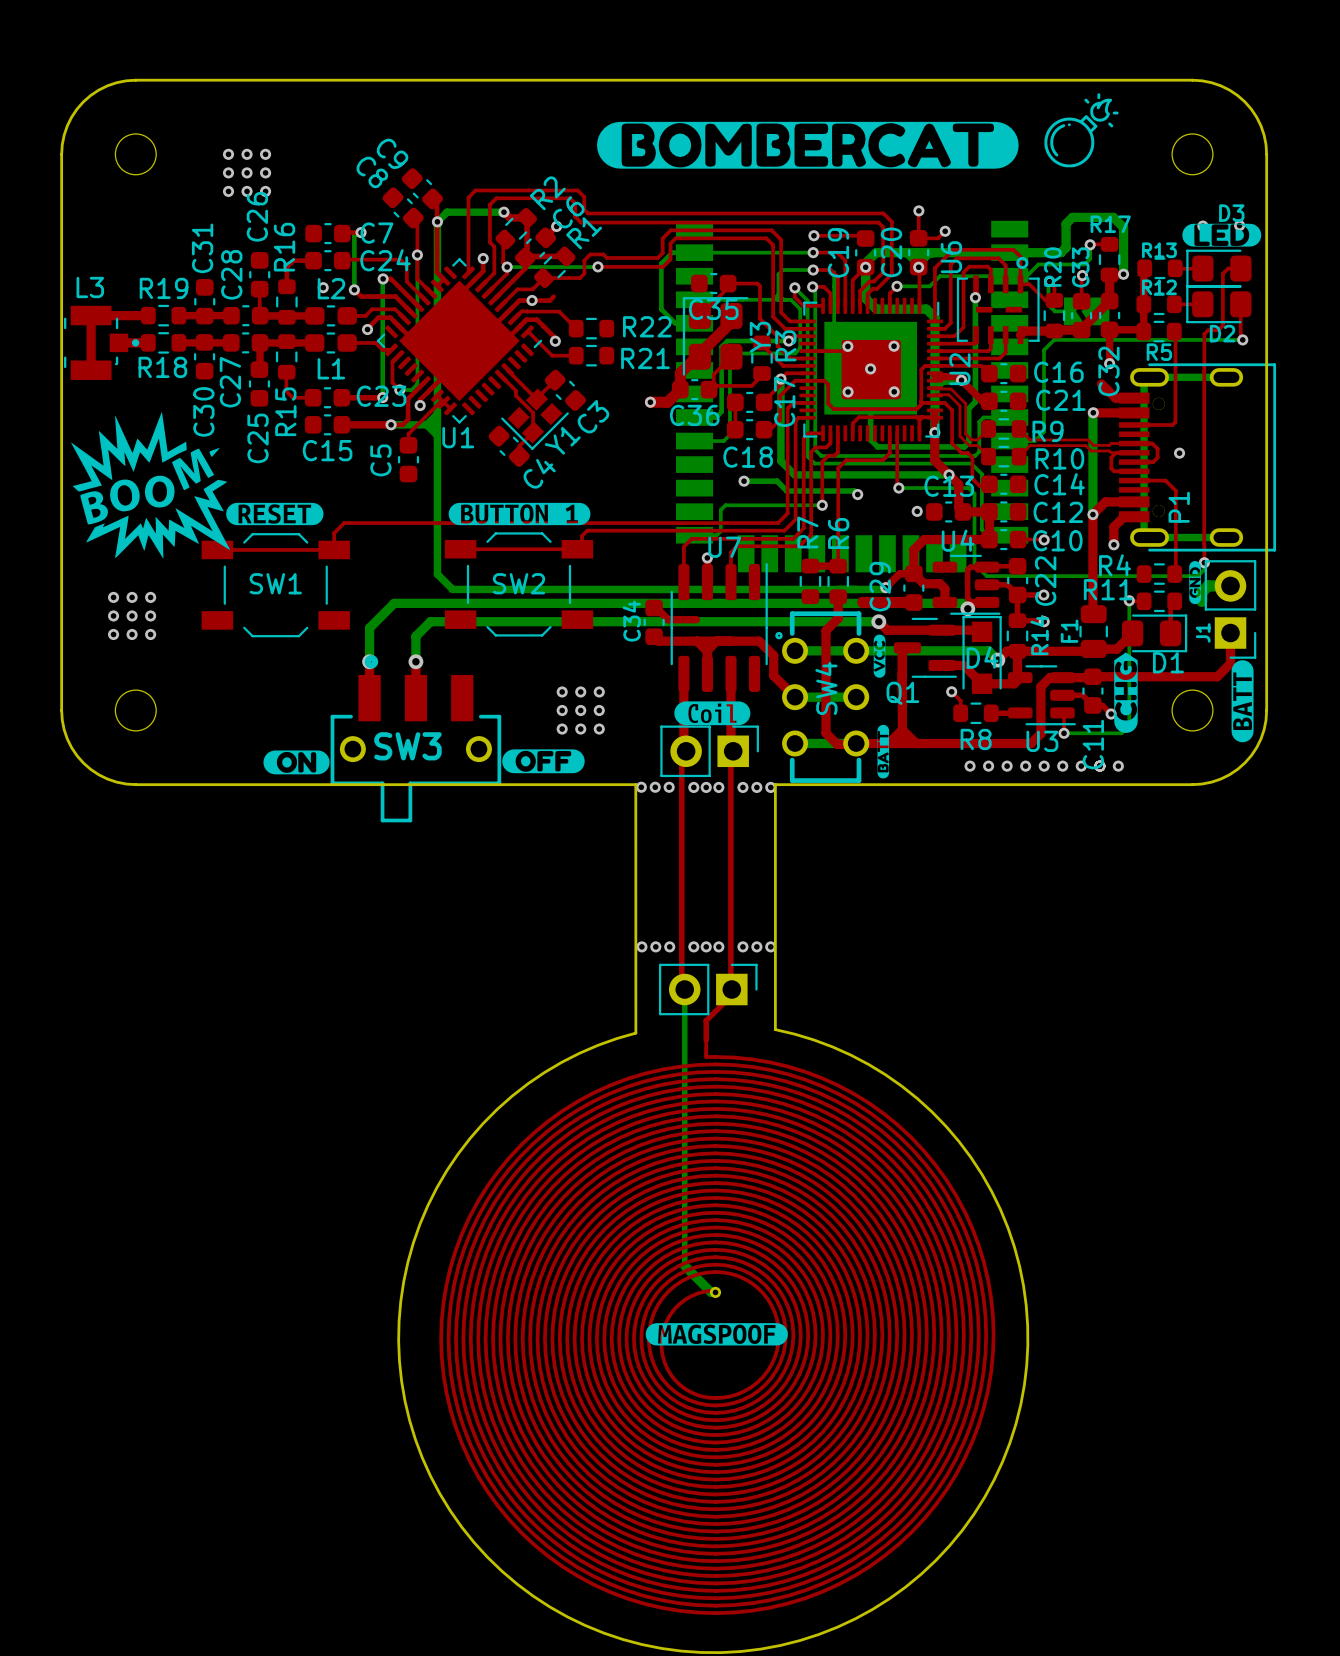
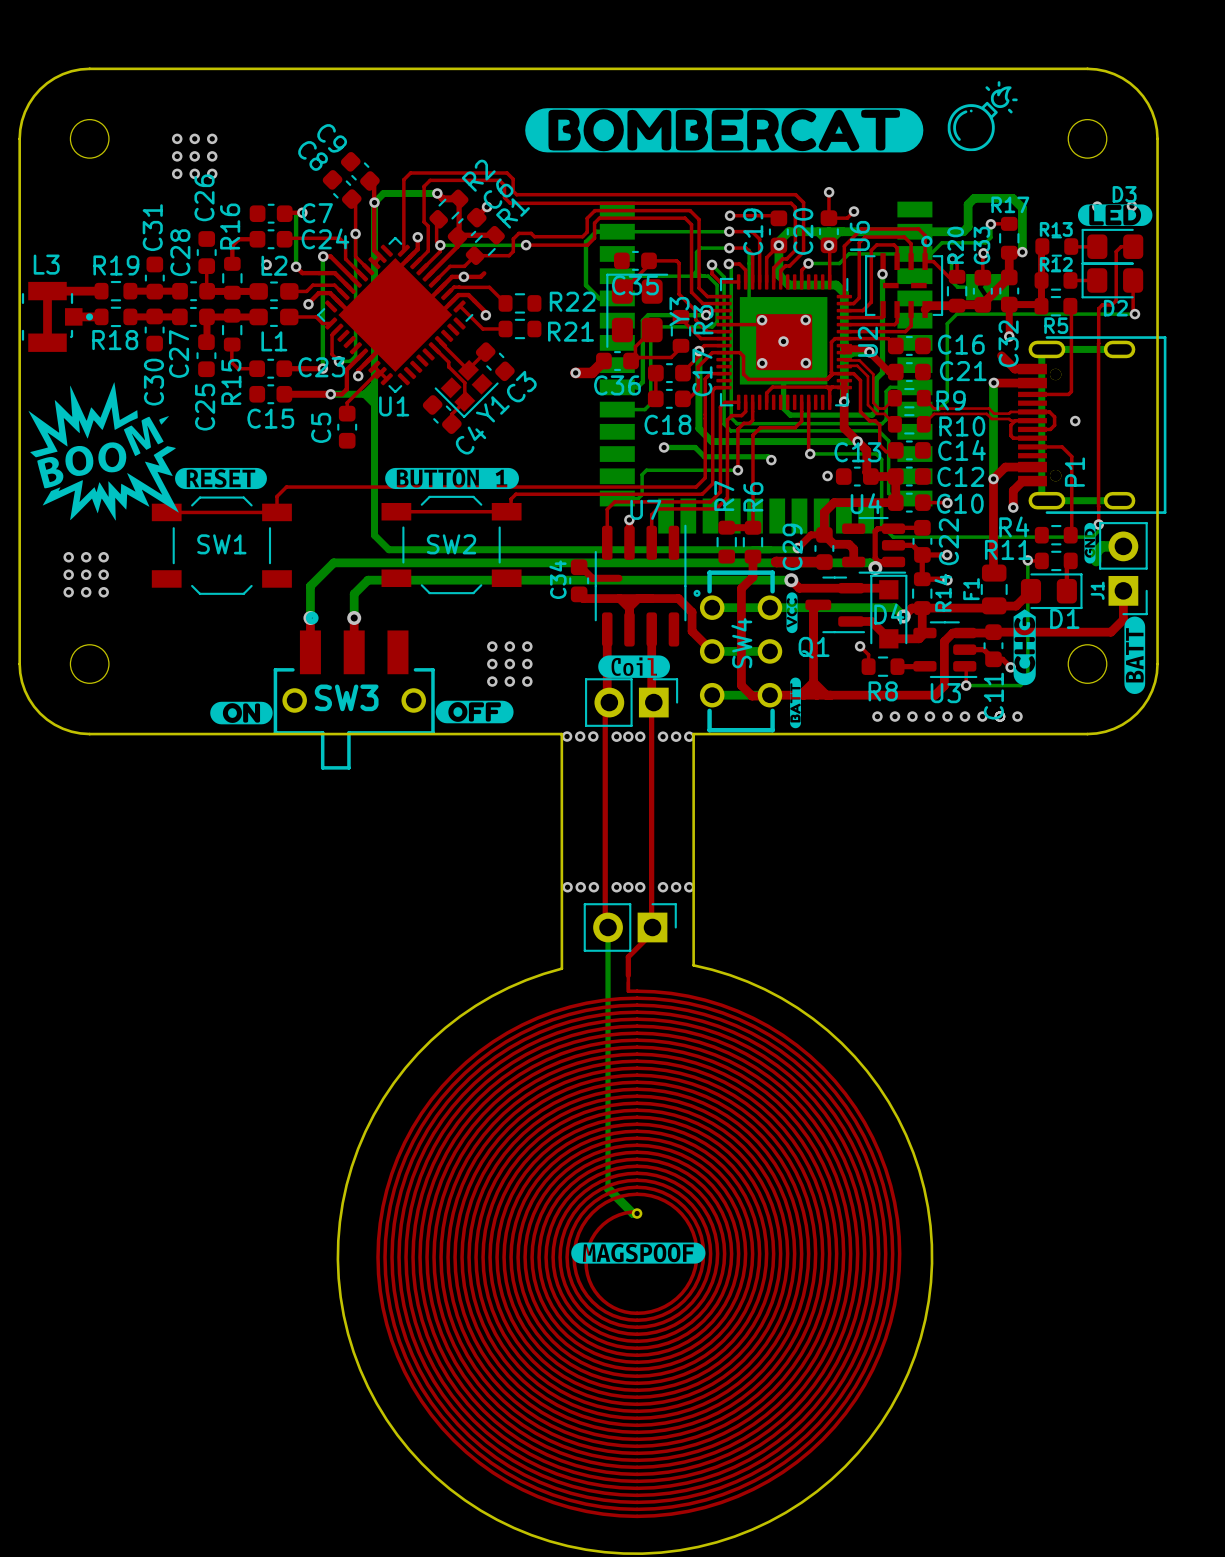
top track: (731, 316) (731, 322) (680, 373) (680, 389) -> none

